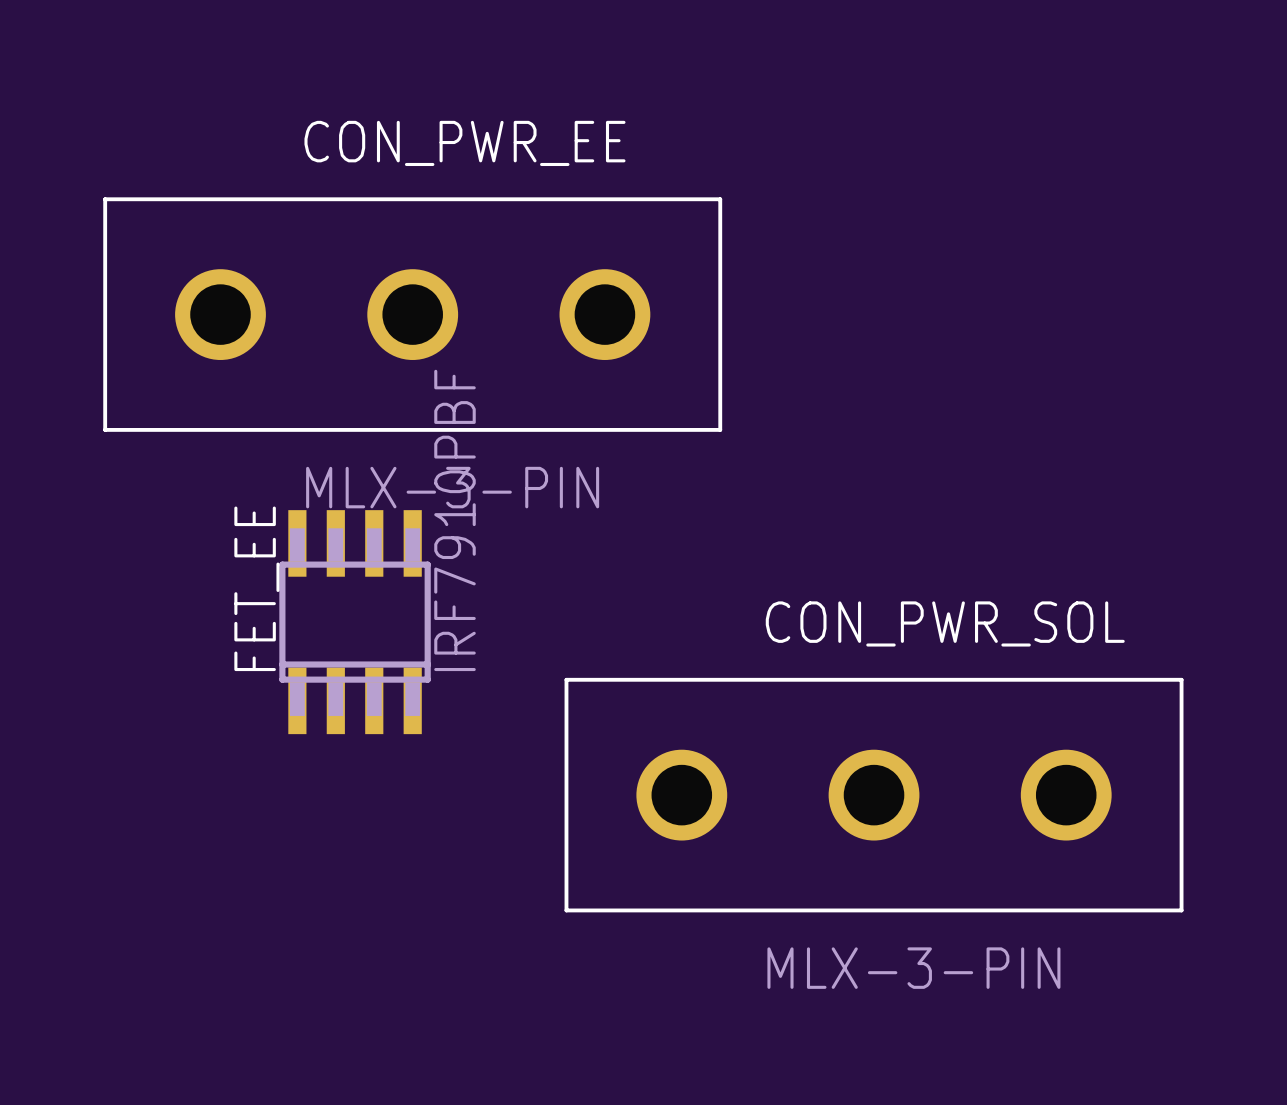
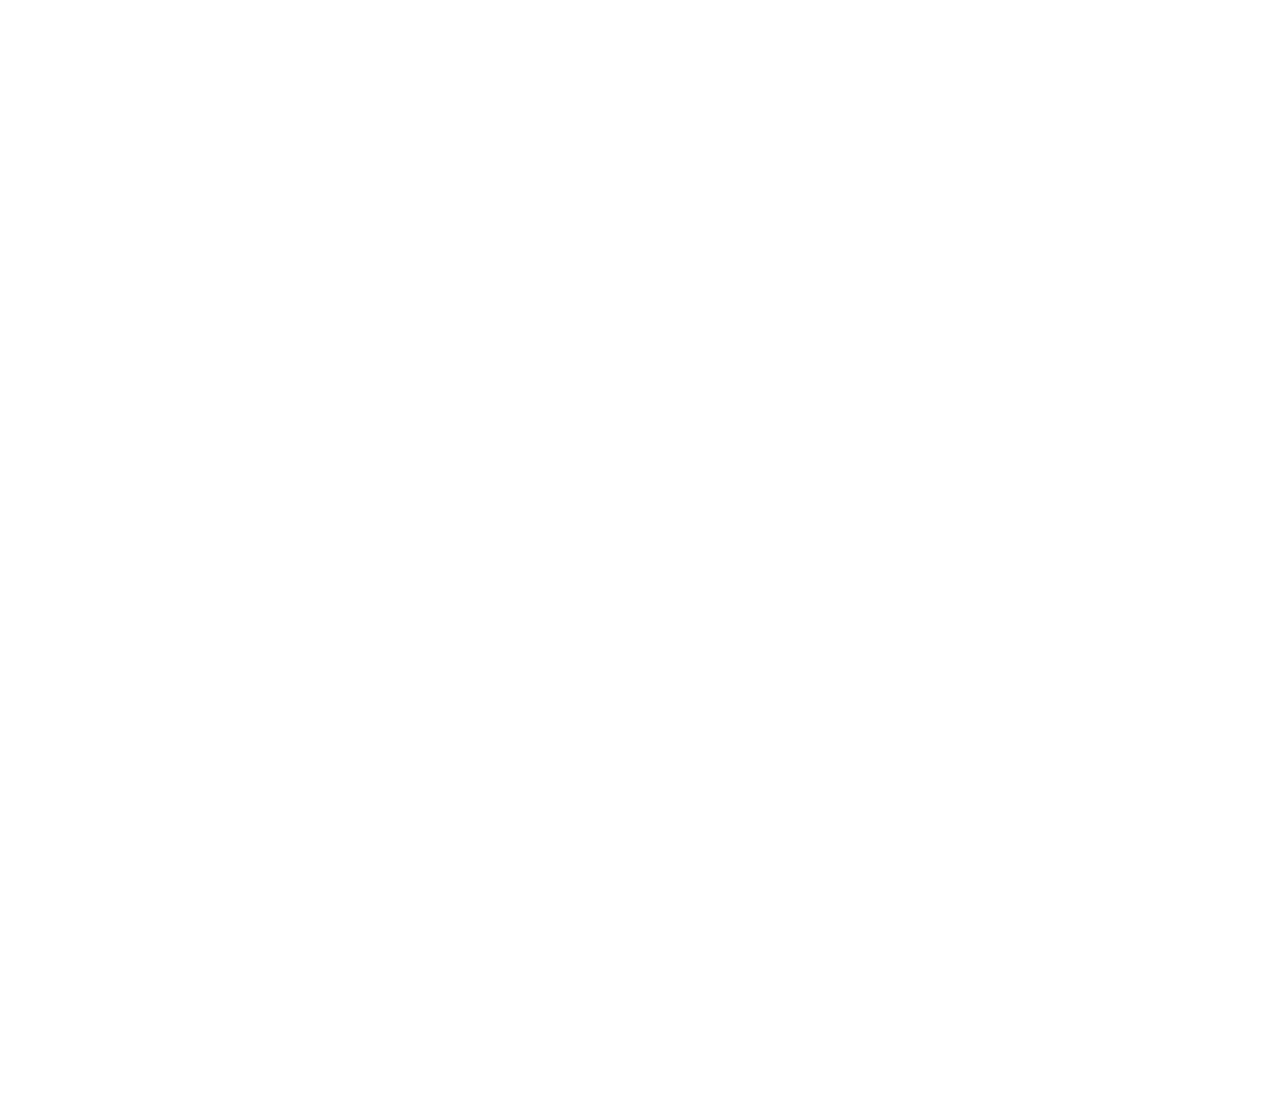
CON_PWR_EE: MLX-3-PIN (412, 314) -> none
FET_EE: IRF7910PBF (355, 622) -> none
CON_PWR_SOL: MLX-3-PIN (874, 795) -> none

